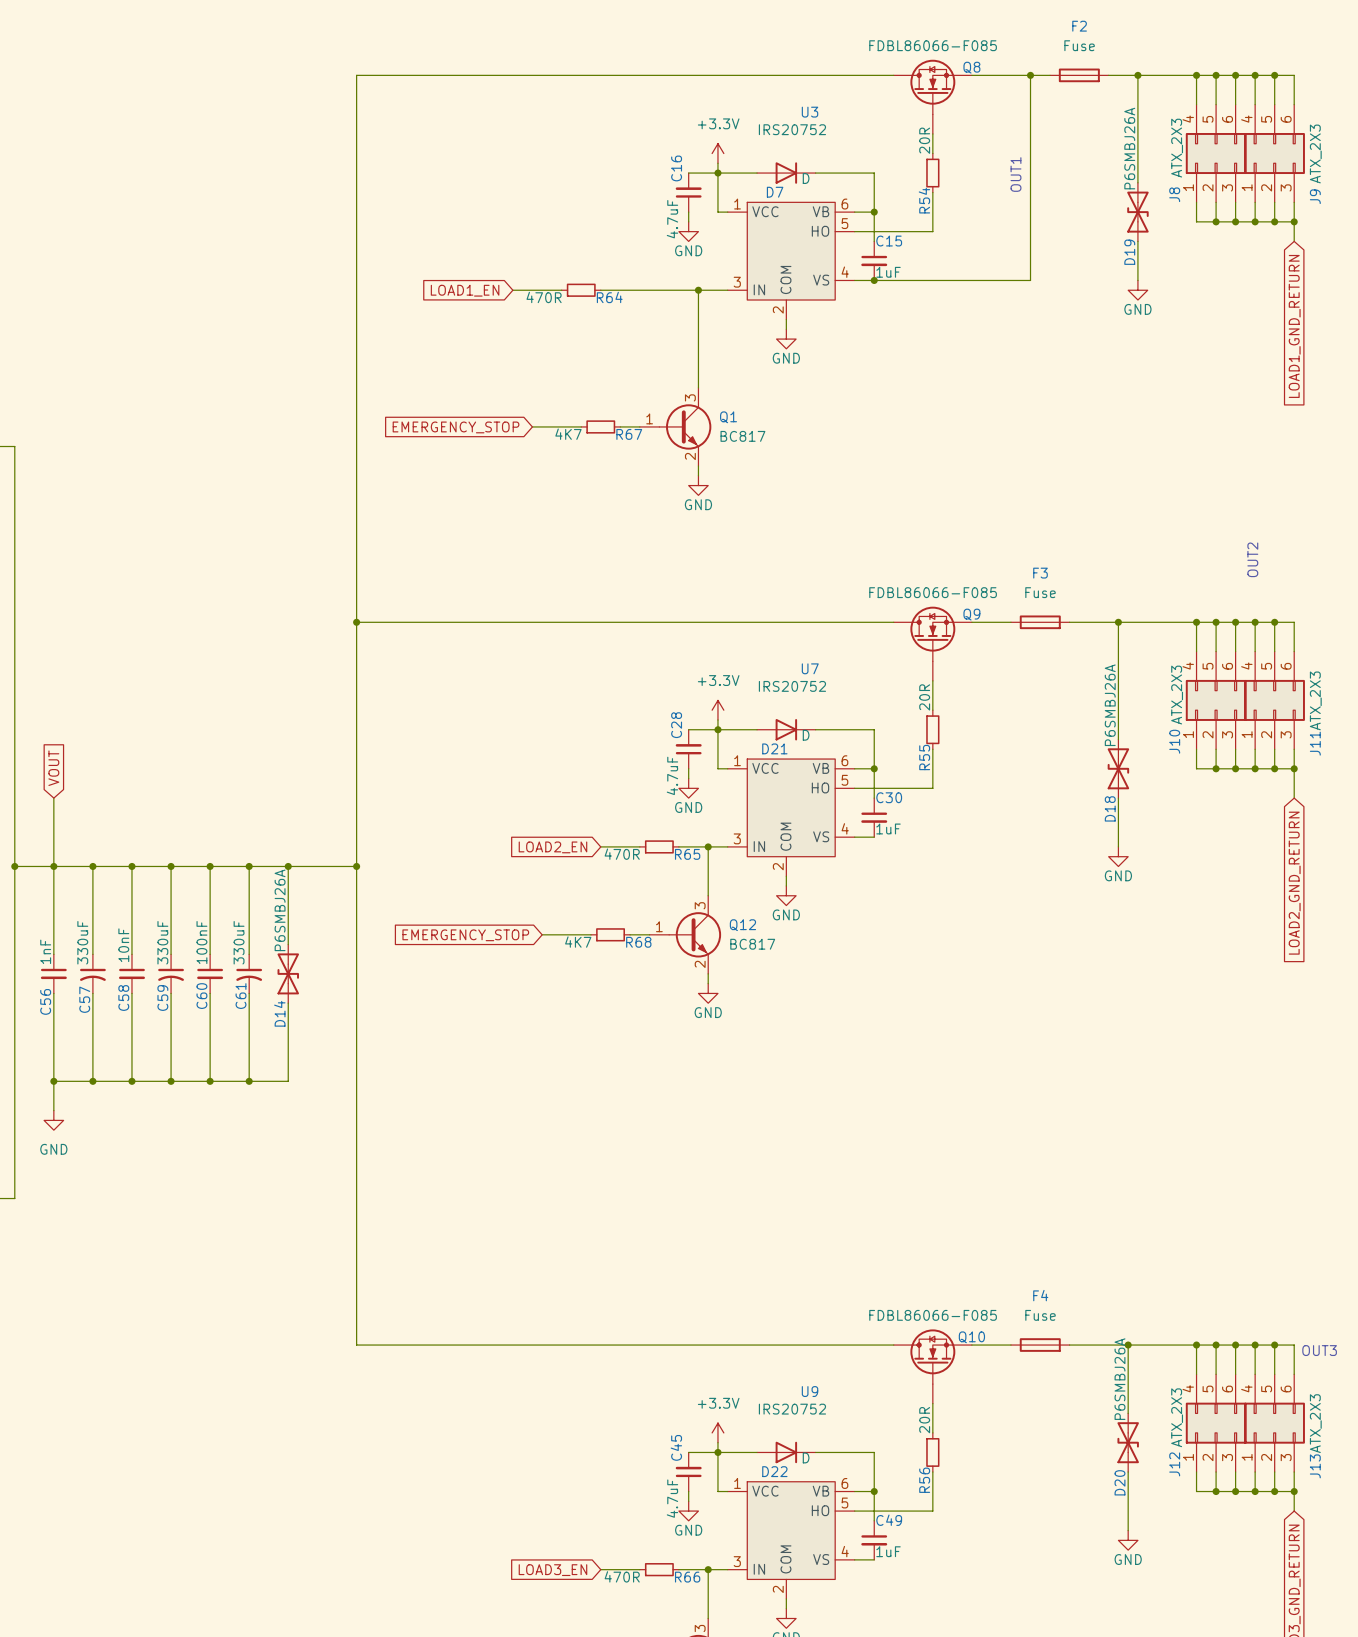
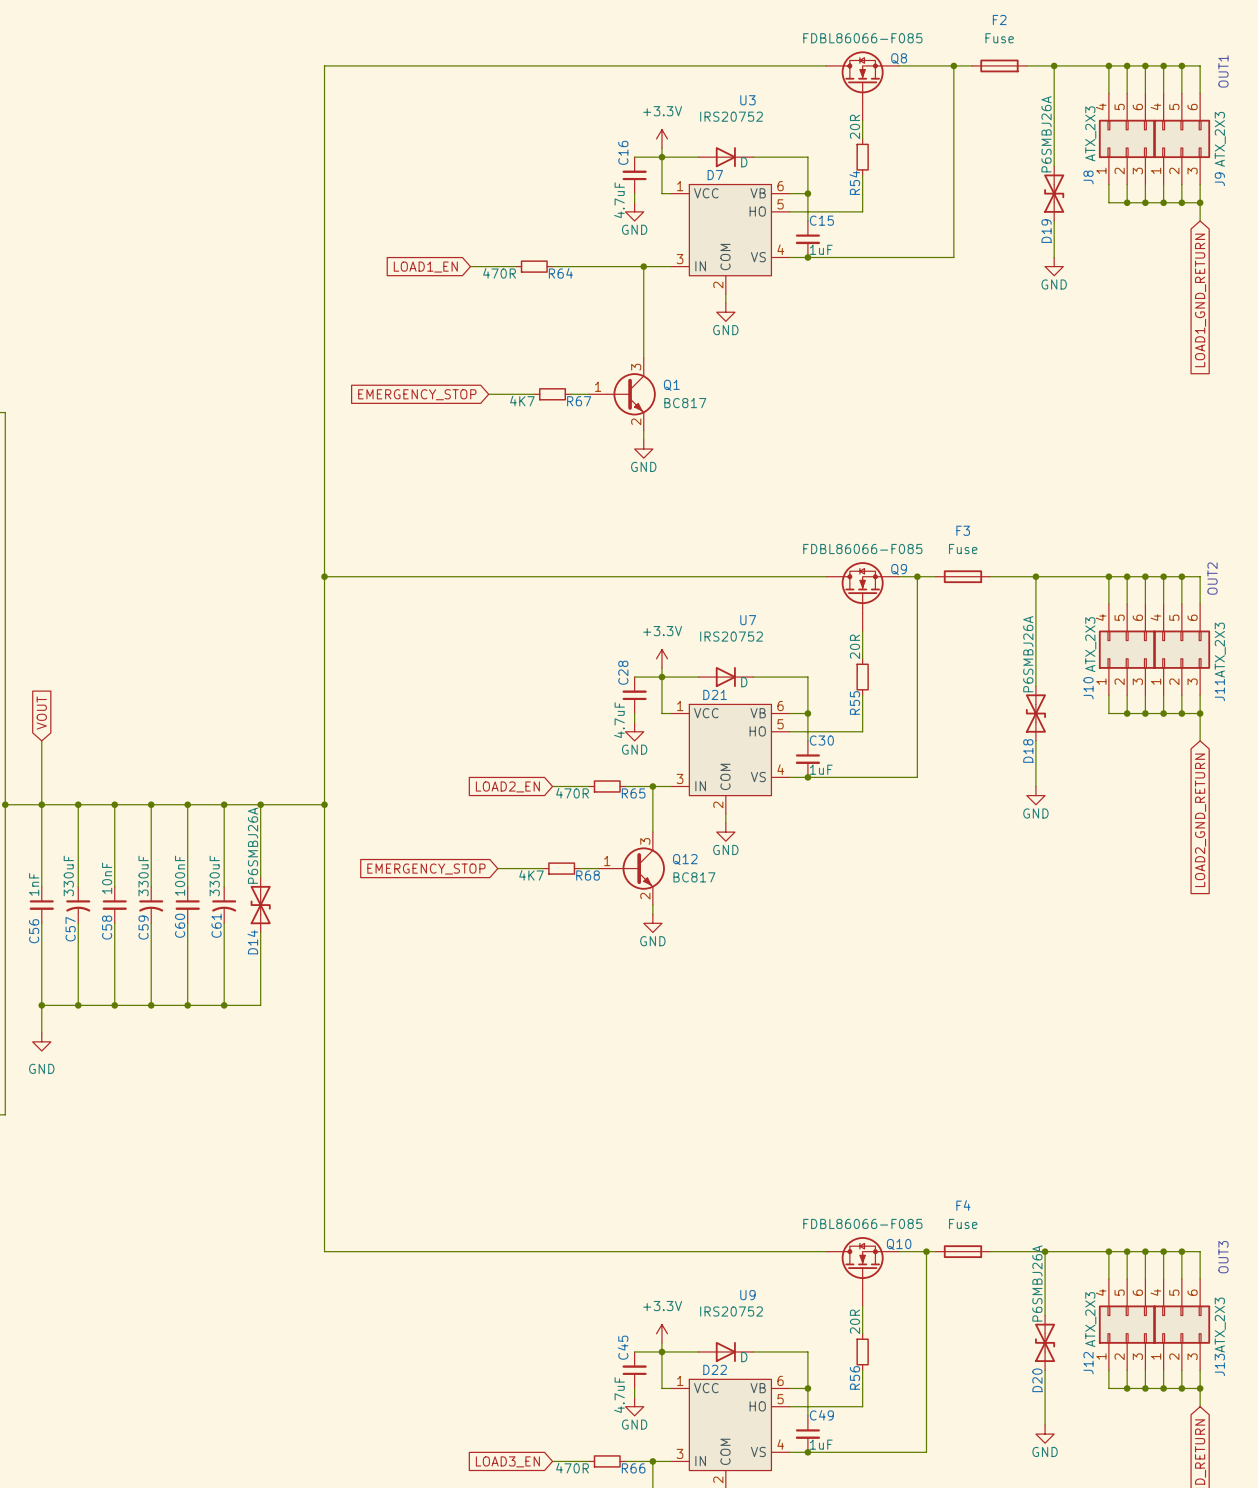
text: none -> OUT1 (1223, 71)
text: OUT1 (1015, 174) -> none
text position: OUT2 (1252, 559) -> OUT2 (1212, 578)
wire: none -> (917, 576) (917, 777) (807, 777)
junction: none -> (917, 576)
junction: none -> (807, 777)
wire: none -> (926, 1251) (926, 1452) (807, 1452)
junction: none -> (926, 1251)
text rotation: 0° (1319, 1350) -> 90° counterclockwise (1223, 1257)
junction: none -> (807, 1452)

